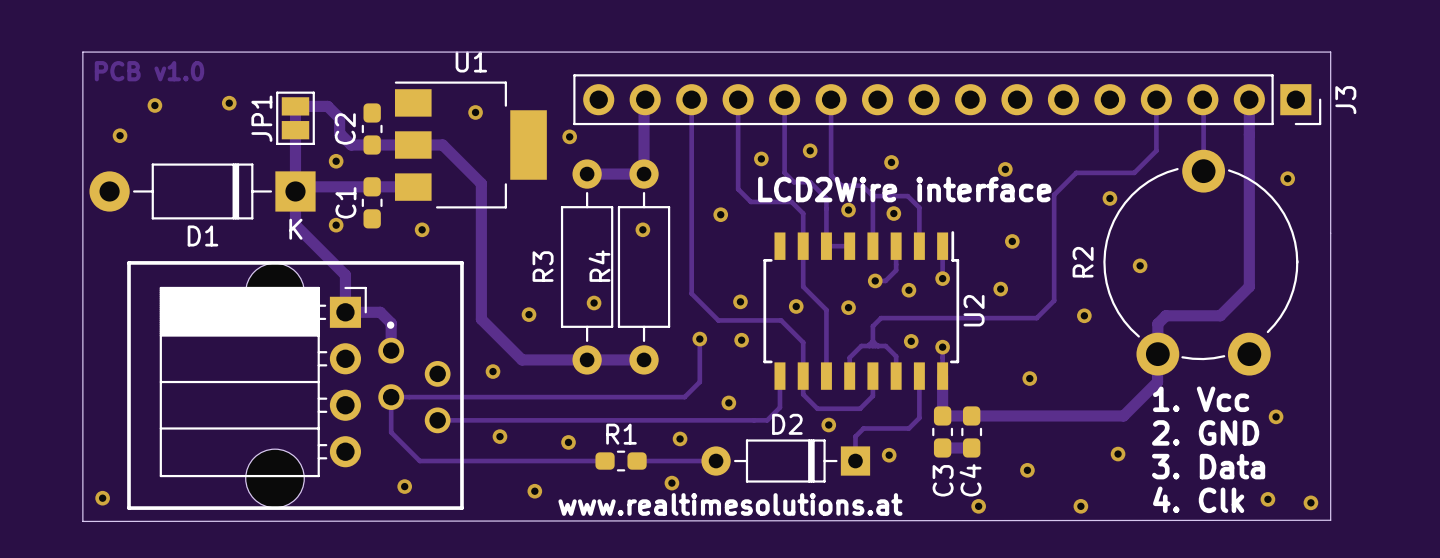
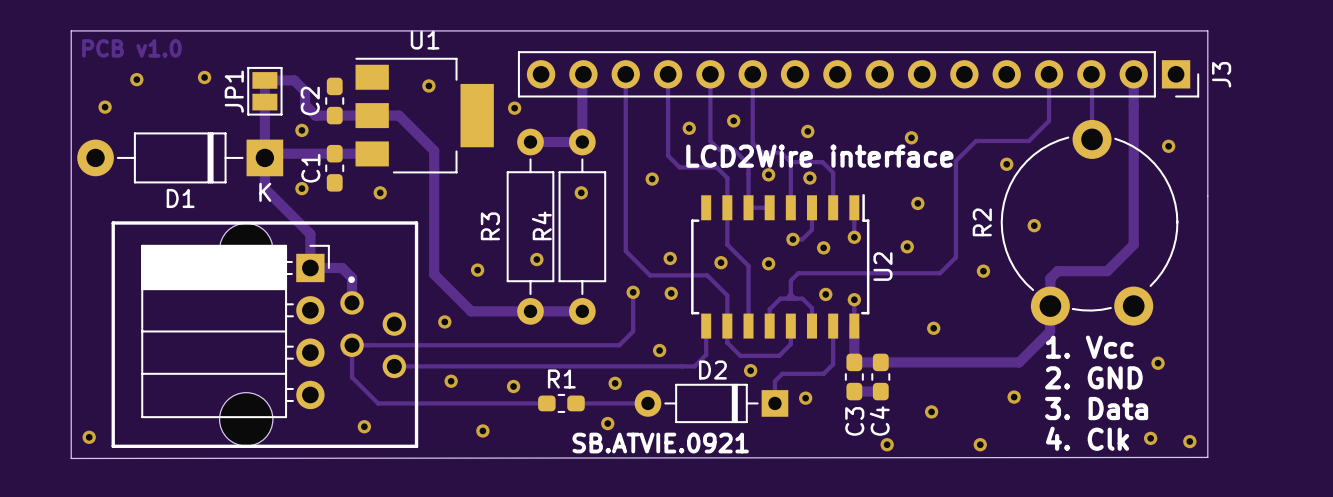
text: www.realtimesolutions.at (730, 504) -> SB.ATVIE.0921 (660, 443)

